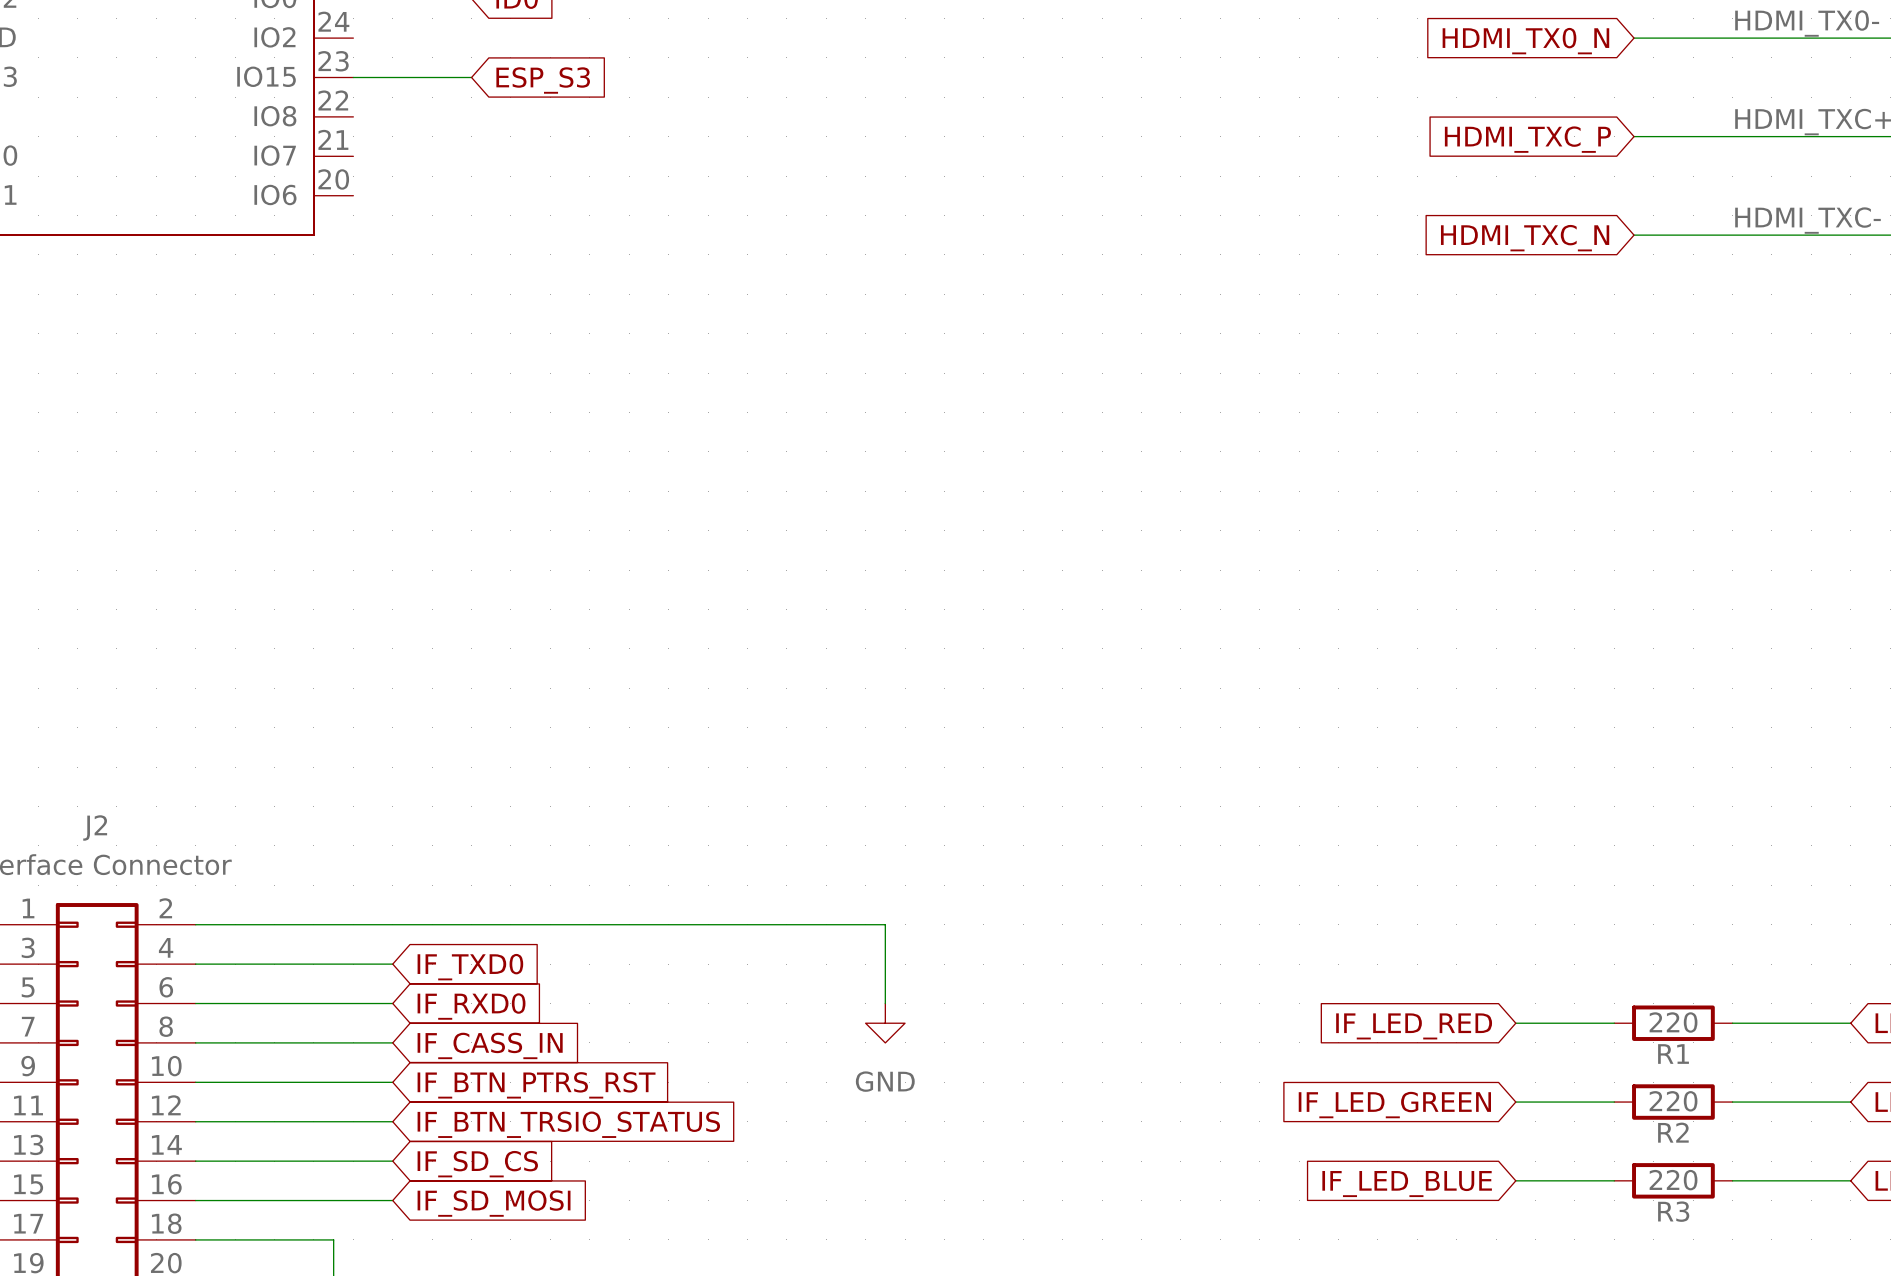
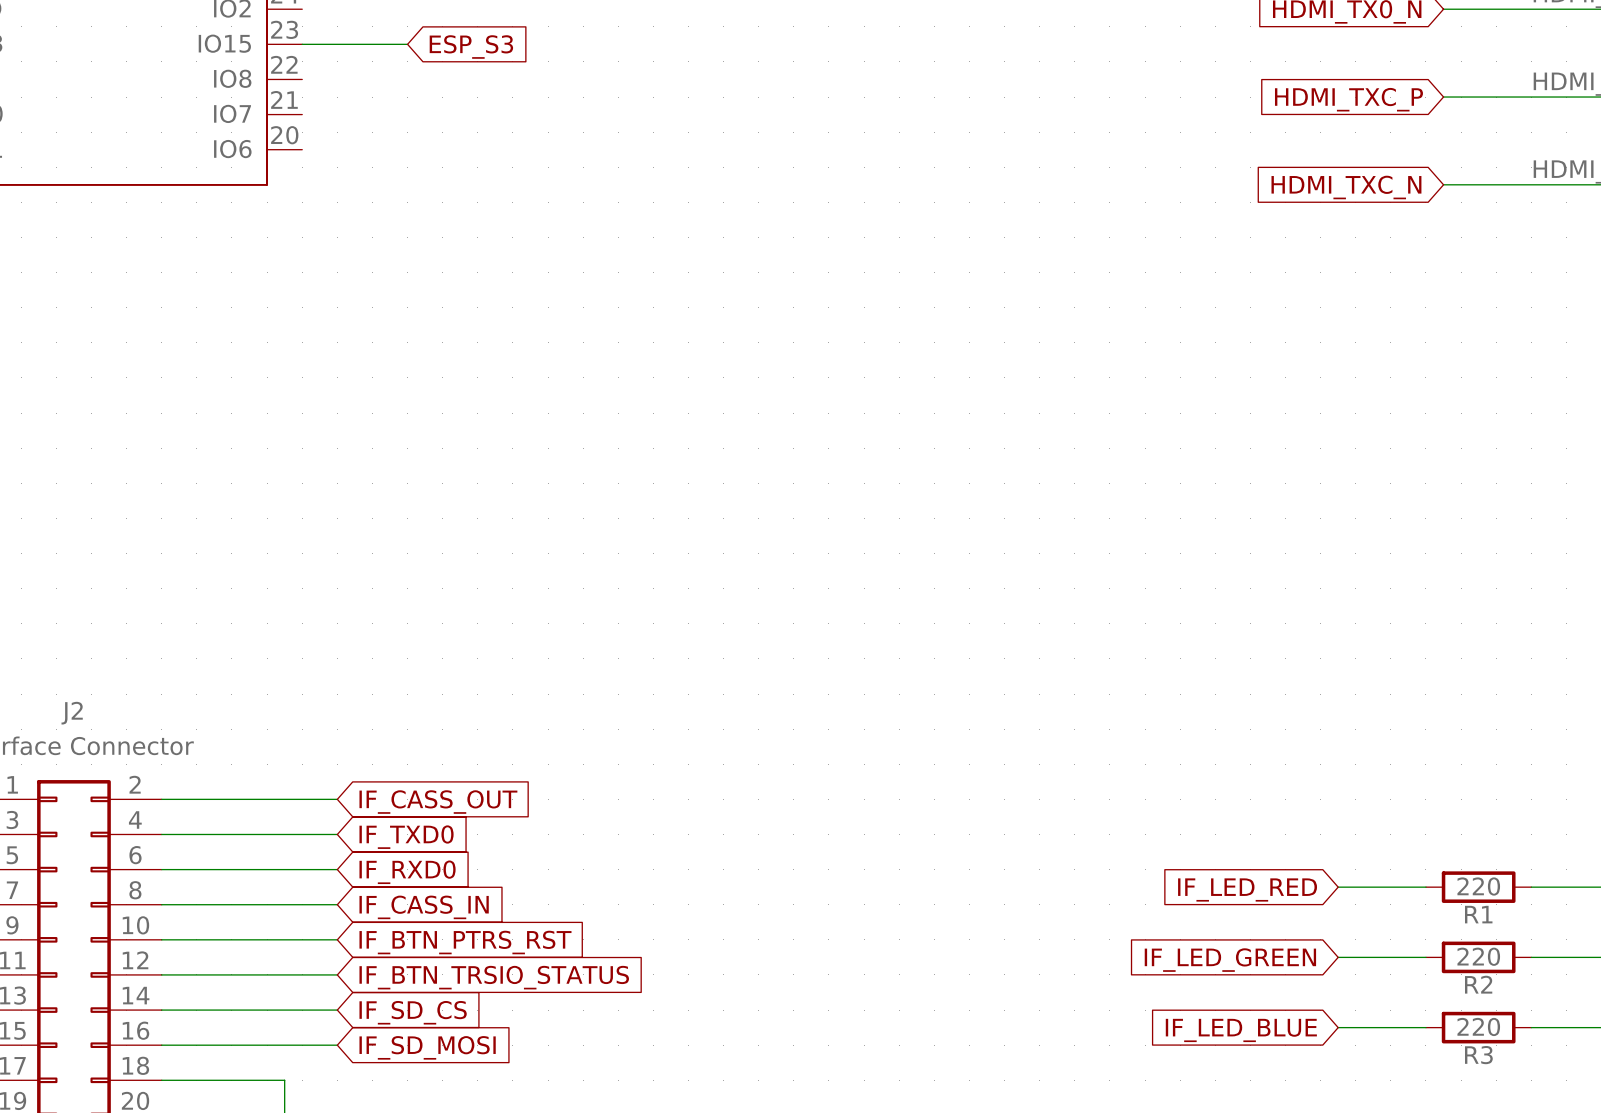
wire: (392, 924) (885, 924) (885, 1003) -> none
global label: none -> IF_CASS_OUT (438, 802)
power symbol: GND (885, 1023) -> none

